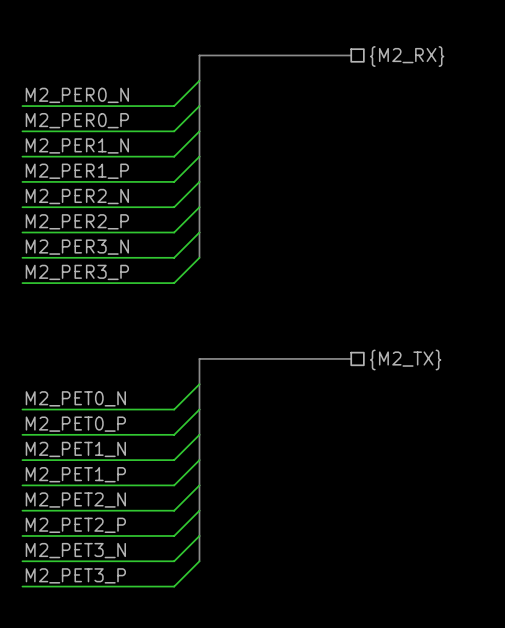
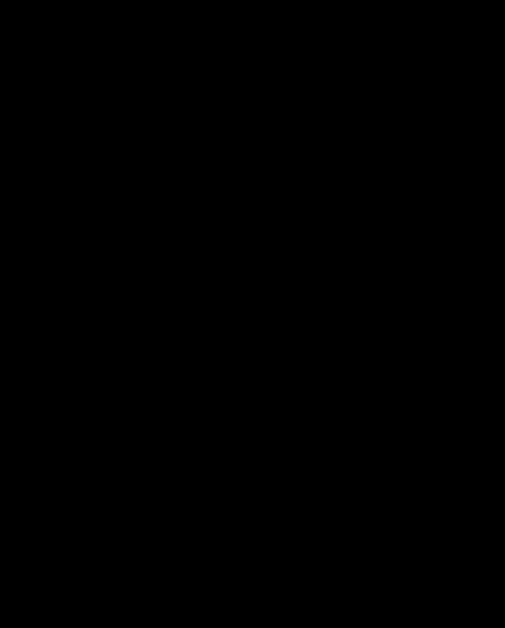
bus: (351, 55) (199, 55) (199, 257) -> none
hierarchical label: {M2_RX} (407, 56) -> none
wire: (199, 80) (174, 106) (22, 106) -> none
label: M2_PER0_N (77, 95) -> none
wire: (199, 106) (174, 131) (22, 131) -> none
label: M2_PER0_P (77, 120) -> none
wire: (199, 131) (174, 156) (22, 156) -> none
label: M2_PER1_N (77, 145) -> none
wire: (199, 156) (174, 181) (22, 181) -> none
label: M2_PER1_P (77, 171) -> none
wire: (199, 181) (174, 207) (22, 207) -> none
label: M2_PER2_N (77, 196) -> none
wire: (199, 207) (174, 232) (22, 232) -> none
label: M2_PER2_P (77, 221) -> none
wire: (199, 232) (174, 257) (22, 257) -> none
label: M2_PER3_N (77, 247) -> none
wire: (199, 257) (174, 283) (22, 283) -> none
label: M2_PER3_P (77, 272) -> none
bus: (351, 358) (199, 358) (199, 561) -> none
hierarchical label: {M2_TX} (405, 359) -> none
wire: (199, 384) (174, 409) (22, 409) -> none
label: M2_PET0_N (75, 398) -> none
wire: (199, 409) (174, 434) (22, 434) -> none
label: M2_PET0_P (75, 424) -> none
wire: (199, 434) (174, 460) (22, 460) -> none
label: M2_PET1_N (75, 449) -> none
wire: (199, 460) (174, 485) (22, 485) -> none
label: M2_PET1_P (75, 474) -> none
wire: (199, 485) (174, 510) (22, 510) -> none
label: M2_PET2_N (75, 500) -> none
wire: (199, 510) (174, 535) (22, 535) -> none
label: M2_PET2_P (75, 525) -> none
wire: (199, 535) (174, 561) (22, 561) -> none
label: M2_PET3_N (75, 550) -> none
wire: (199, 561) (174, 586) (22, 586) -> none
label: M2_PET3_P (75, 575) -> none

